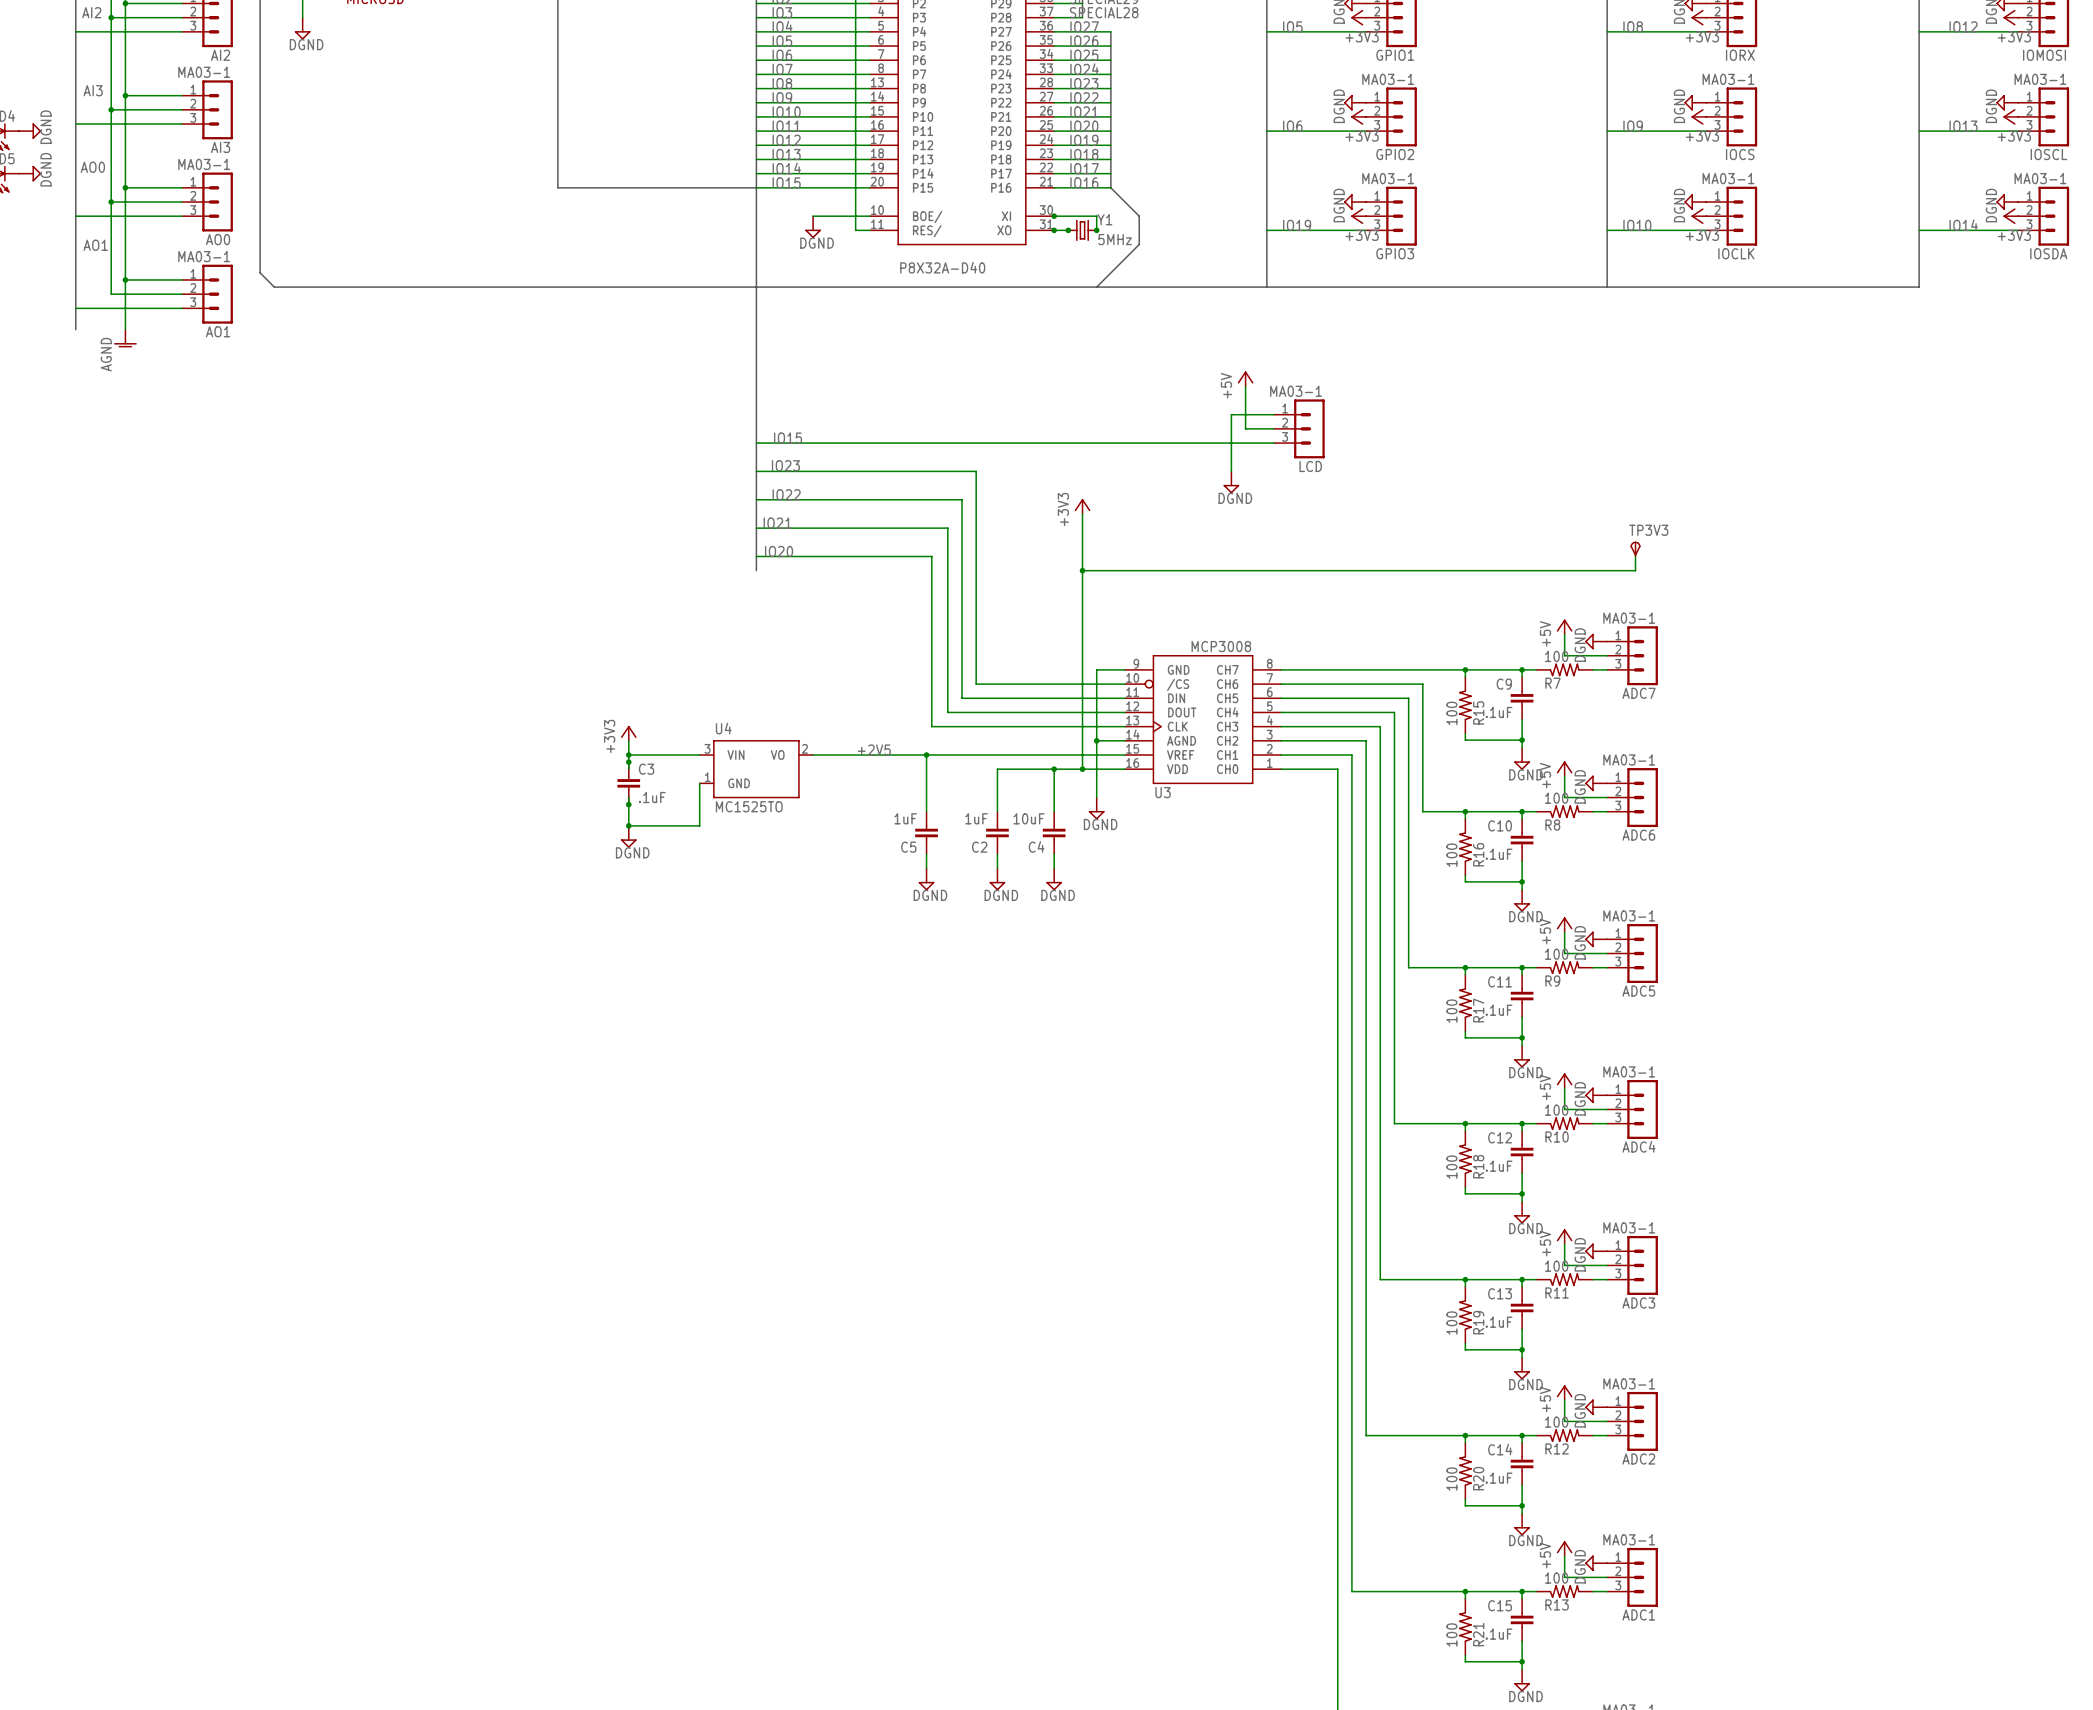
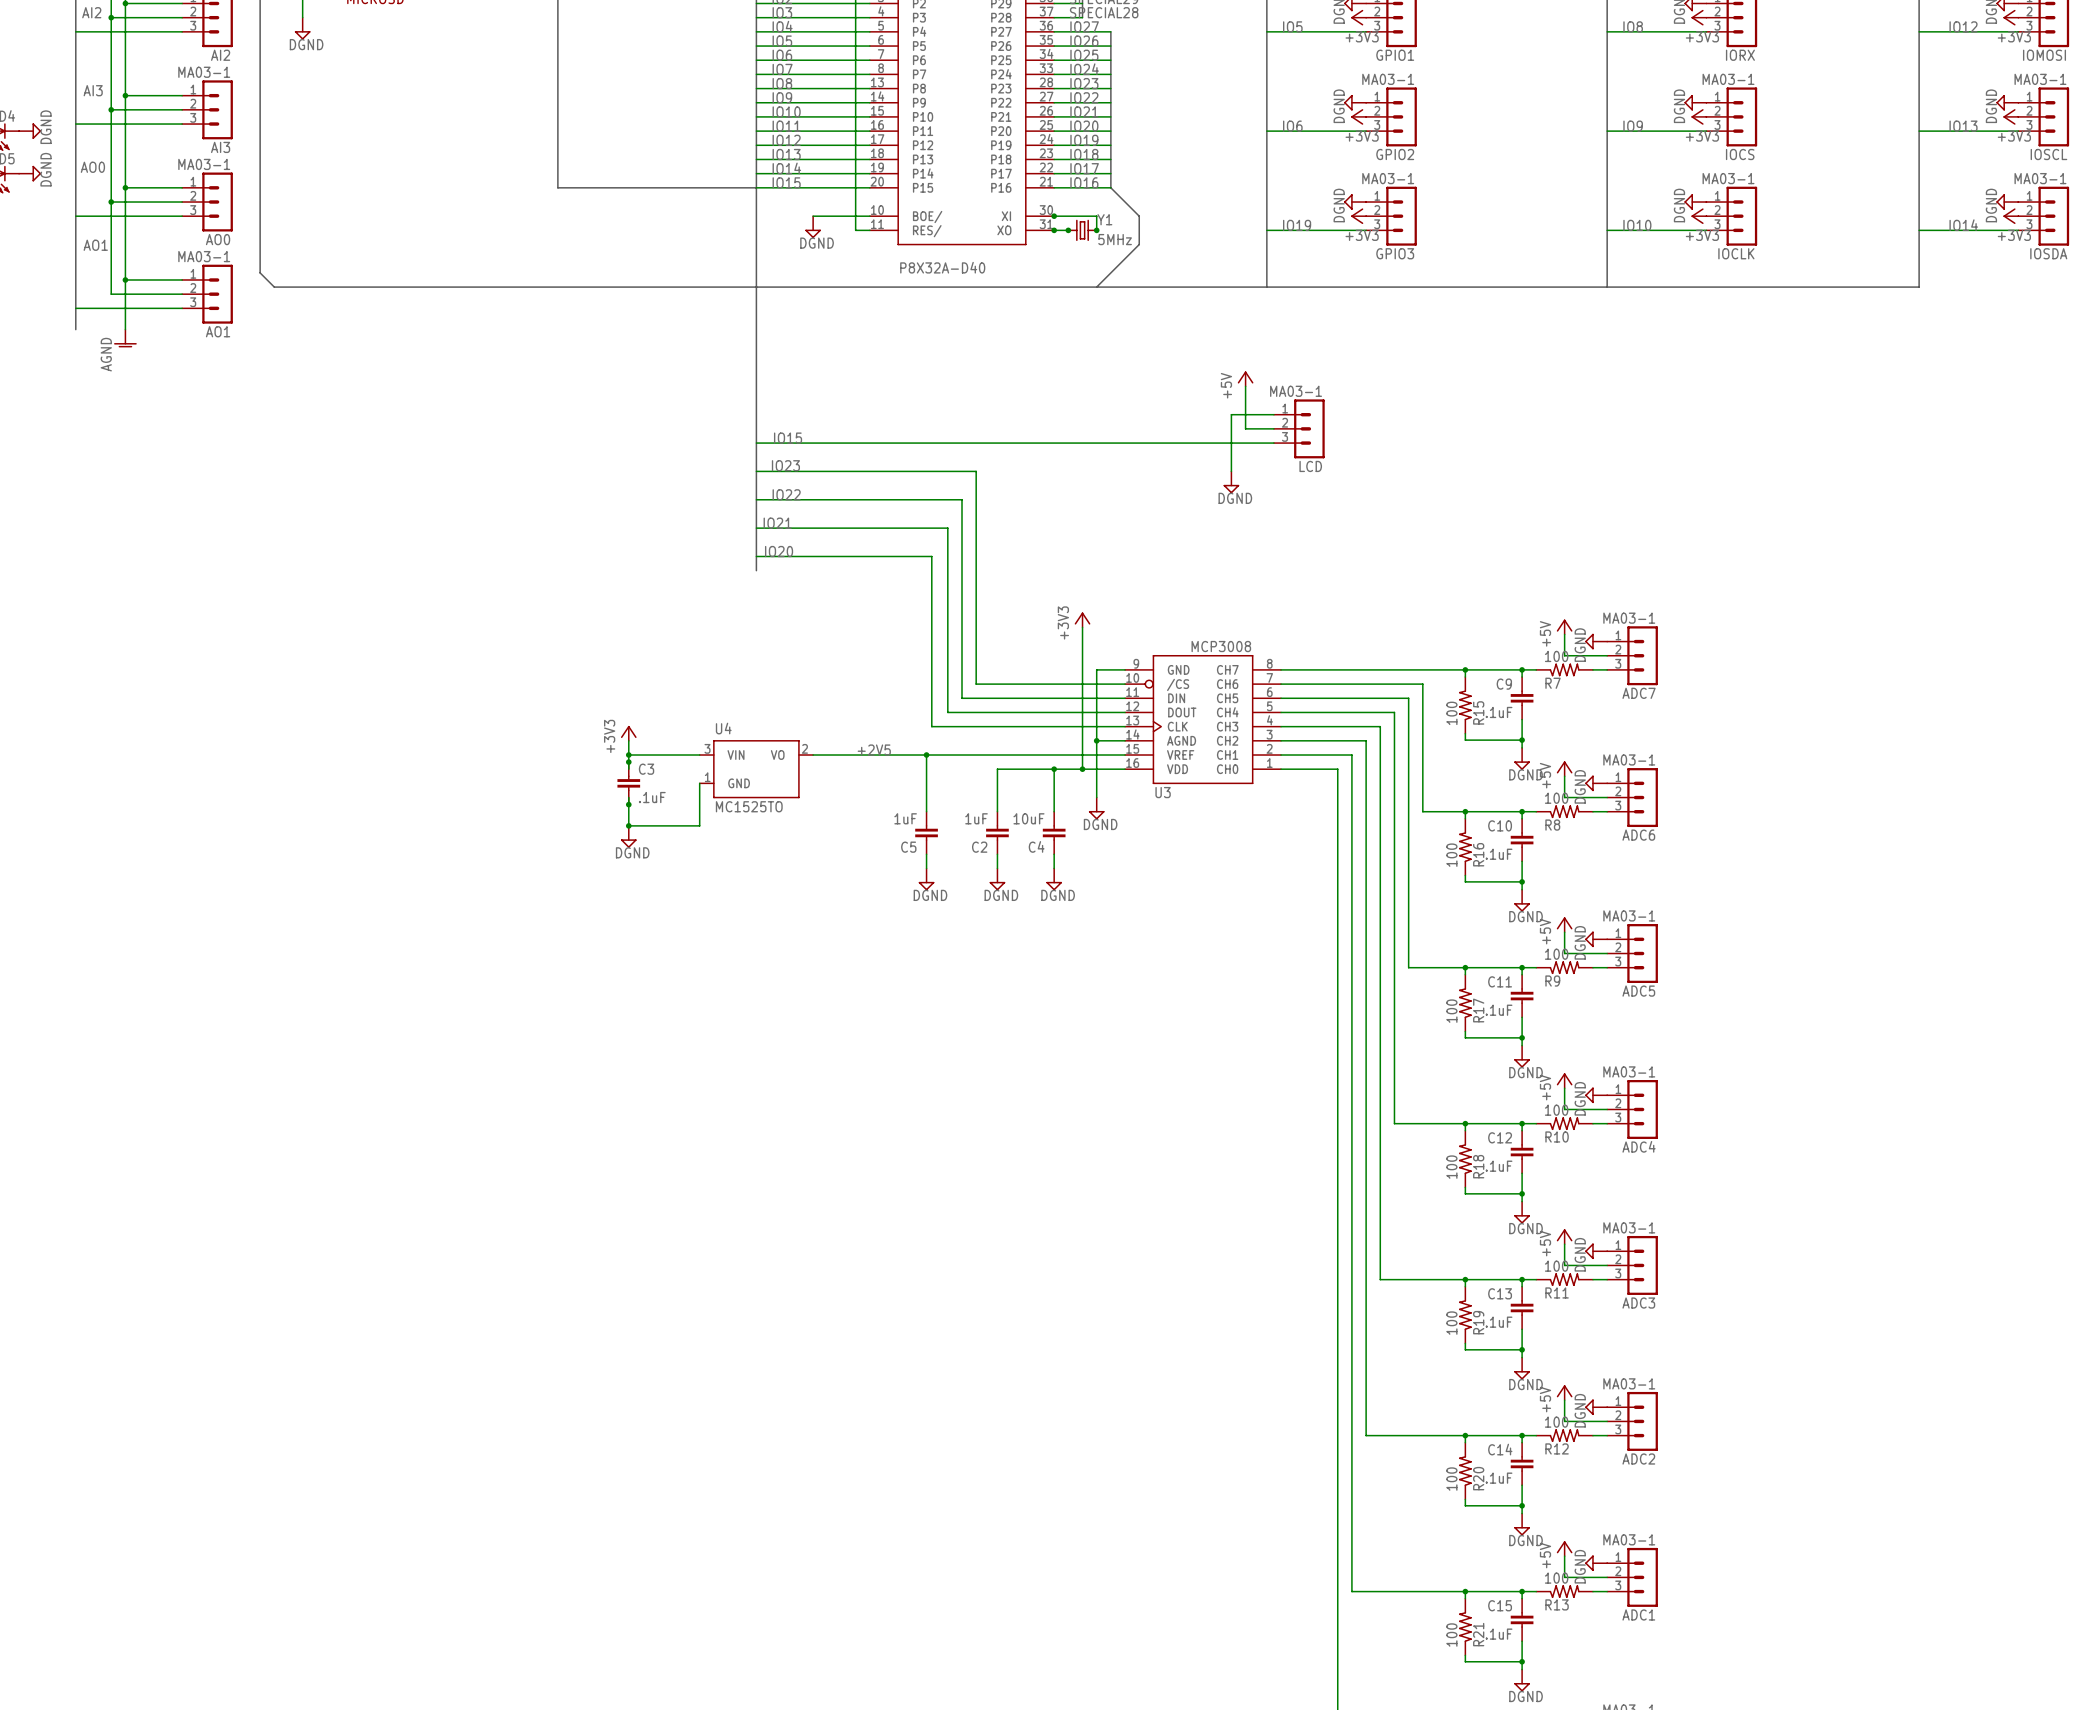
power symbol position: +3V3 (1082, 506) -> +3V3 (1082, 619)
wire: (1082, 513) (1082, 627) -> none
TP3V3: (1635, 549) -> none
wire: (1635, 556) (1635, 570) (1082, 570) -> none
junction: (1082, 570) -> none

